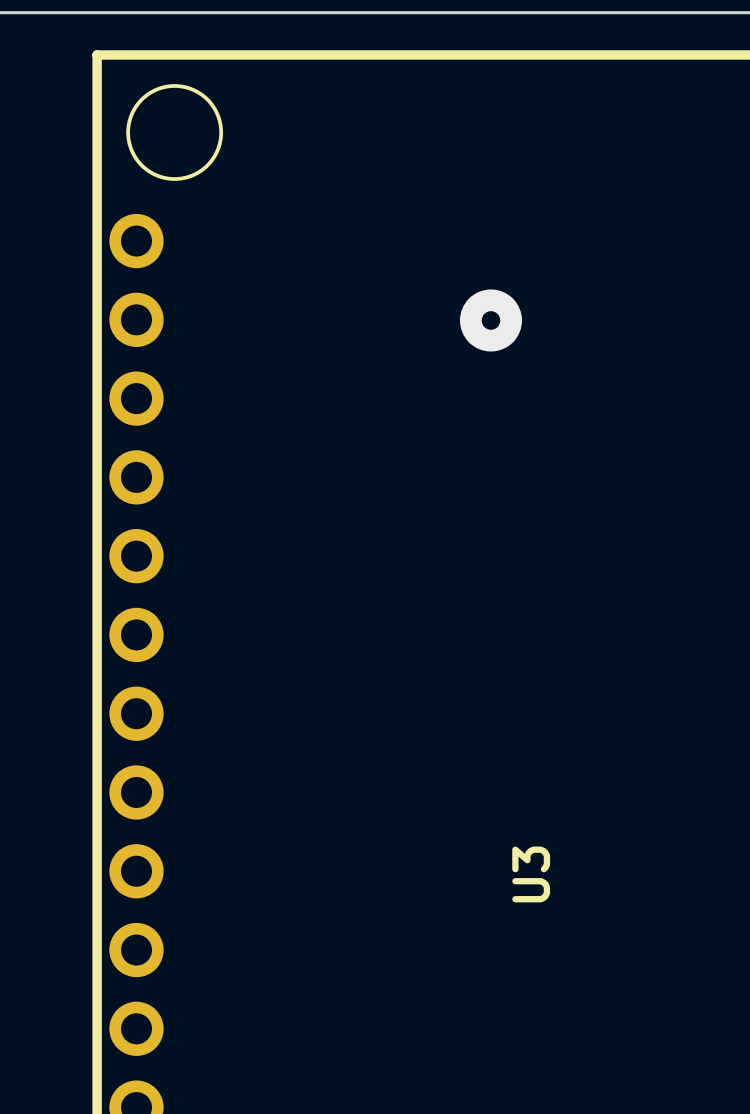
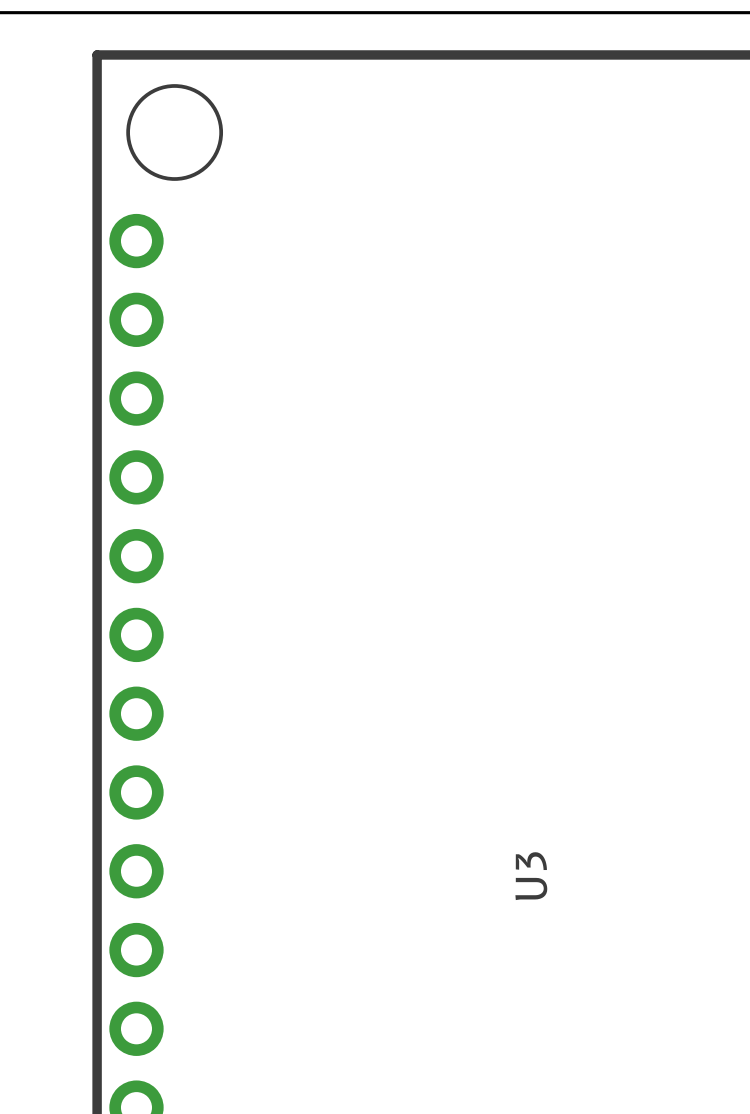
via: (490, 320) -> none

